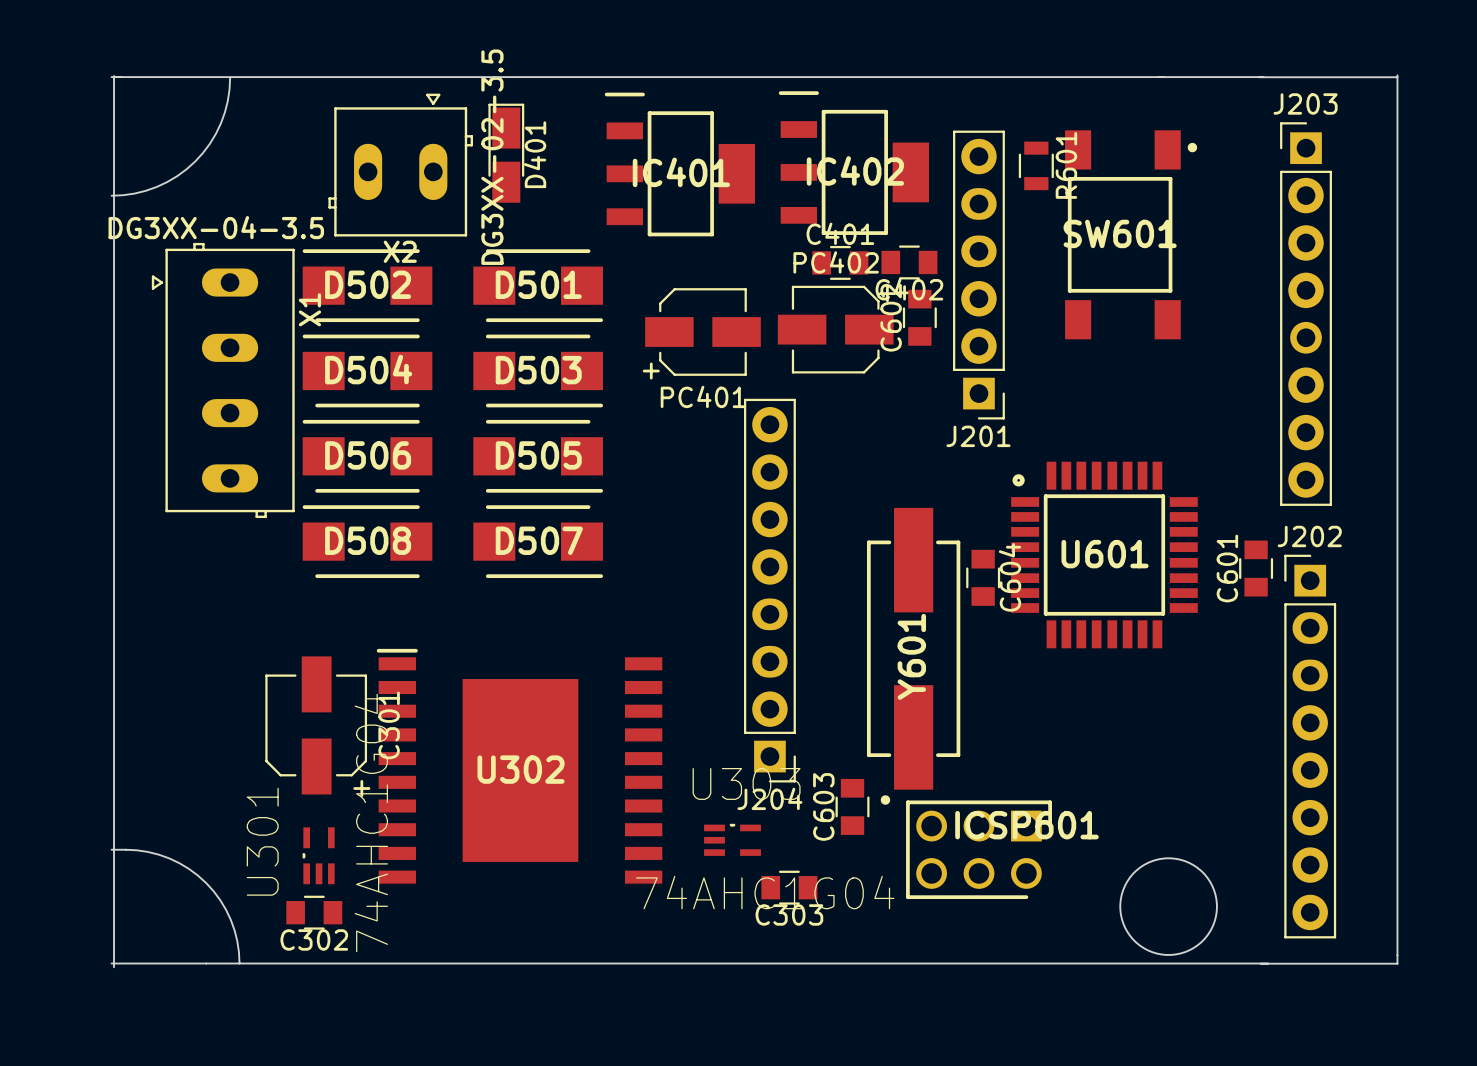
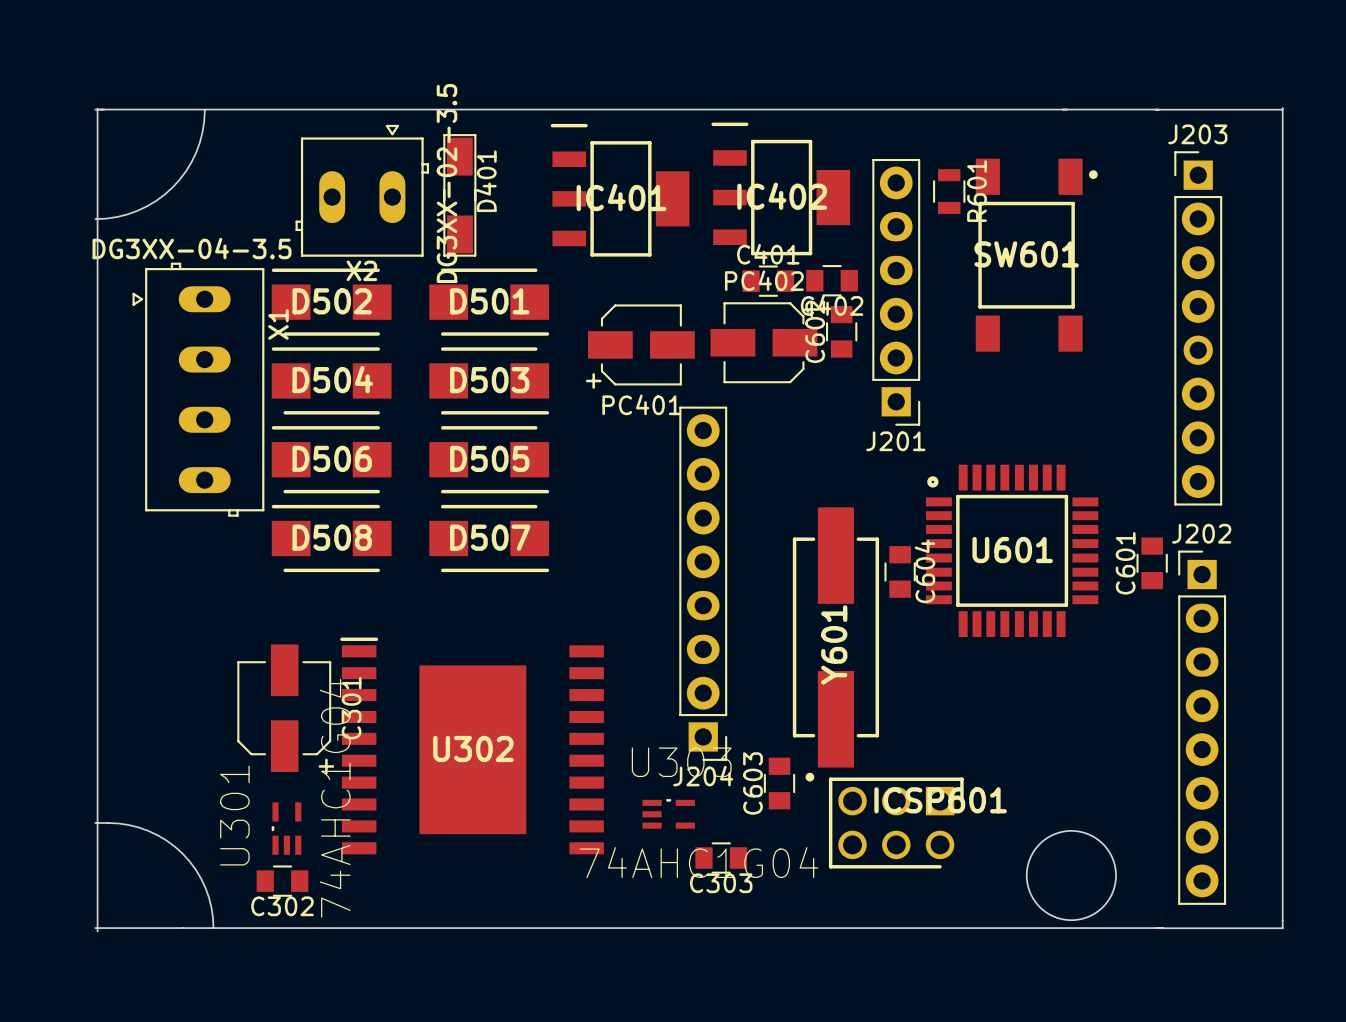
D401 footprint: [488, 103, 525, 203] -> [443, 134, 477, 257]

